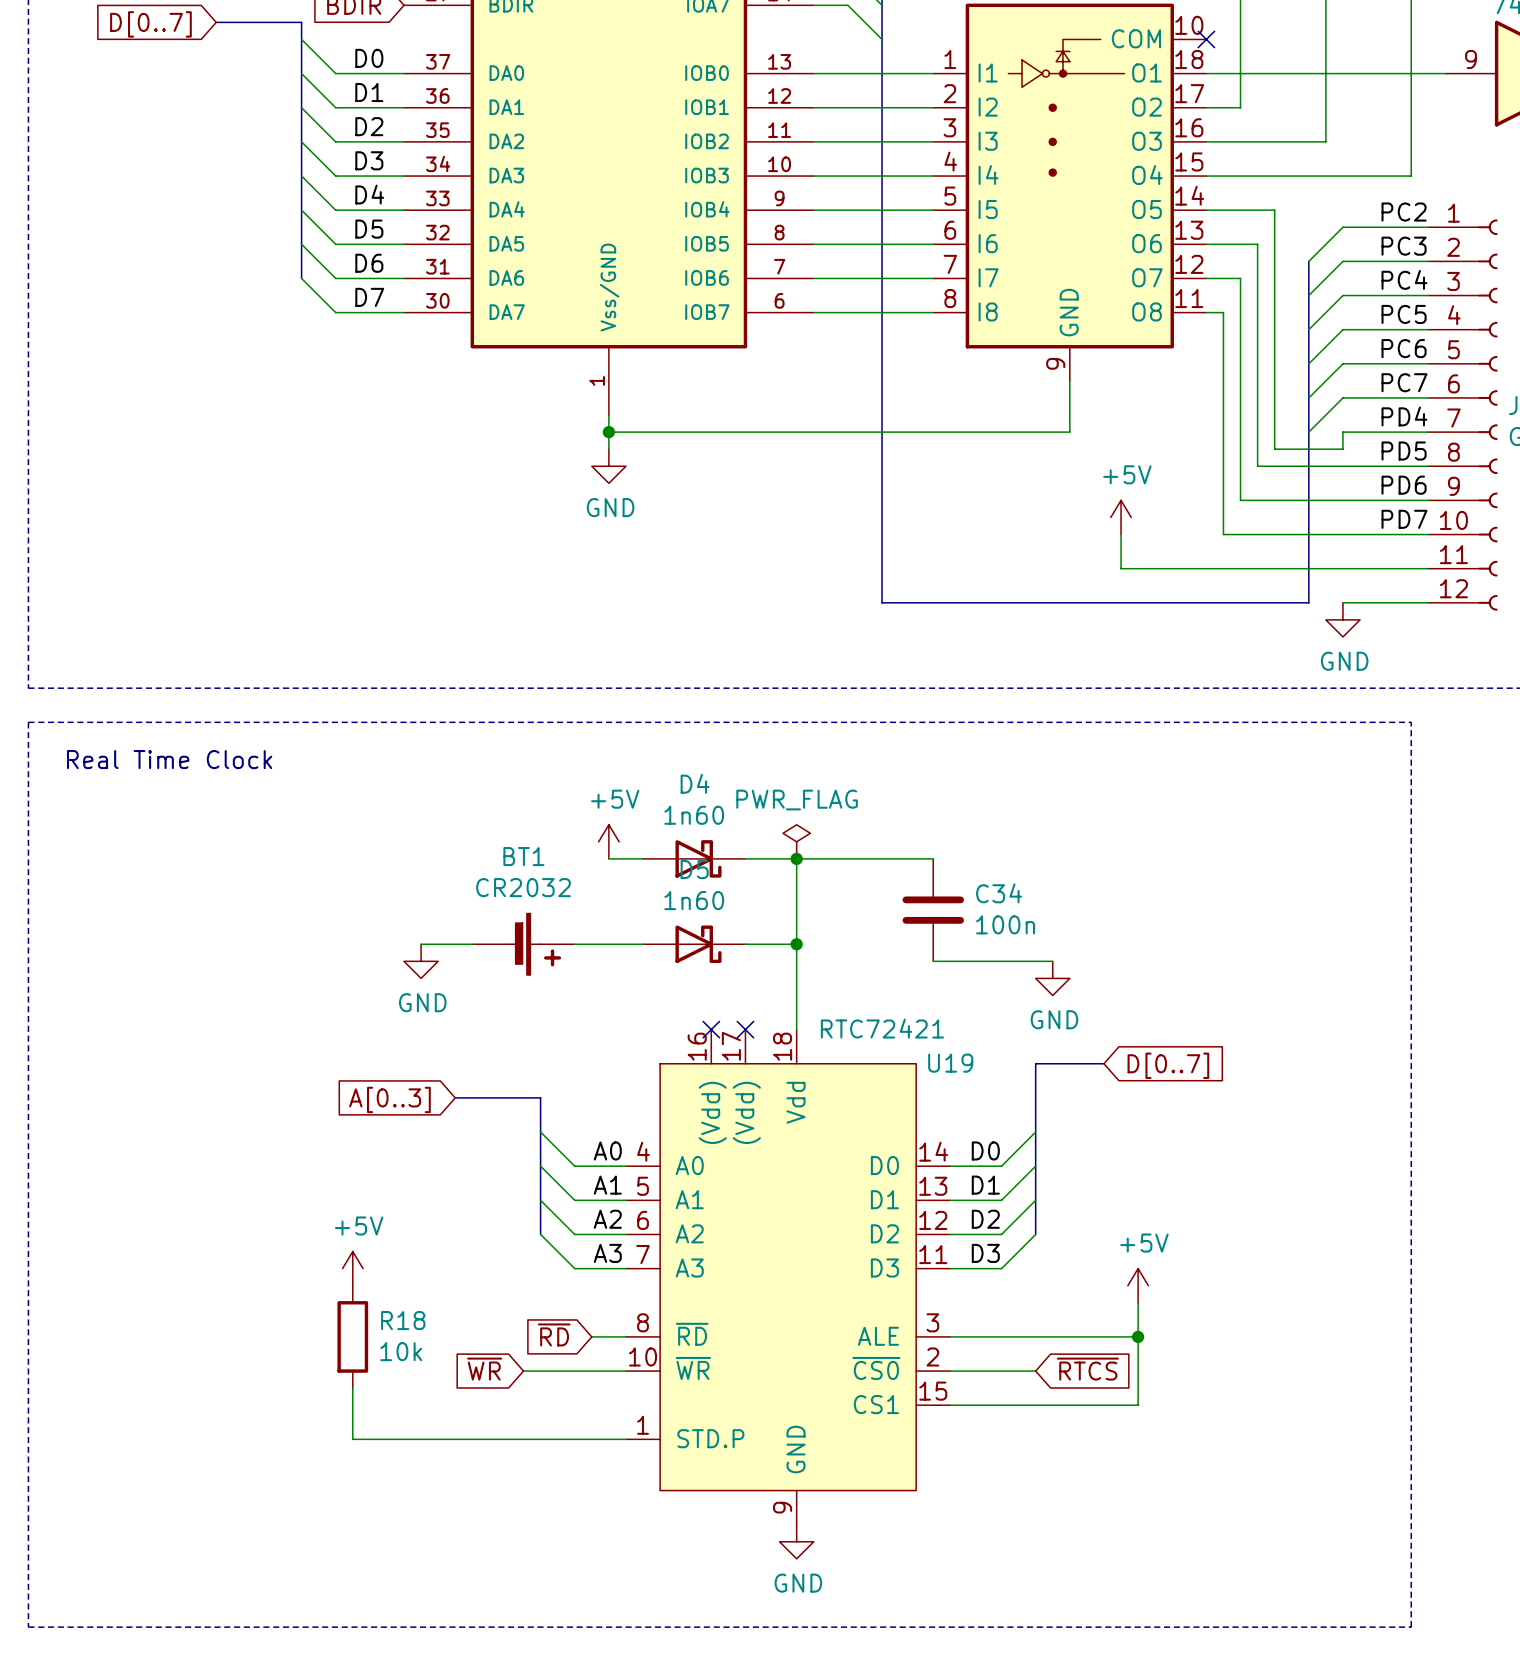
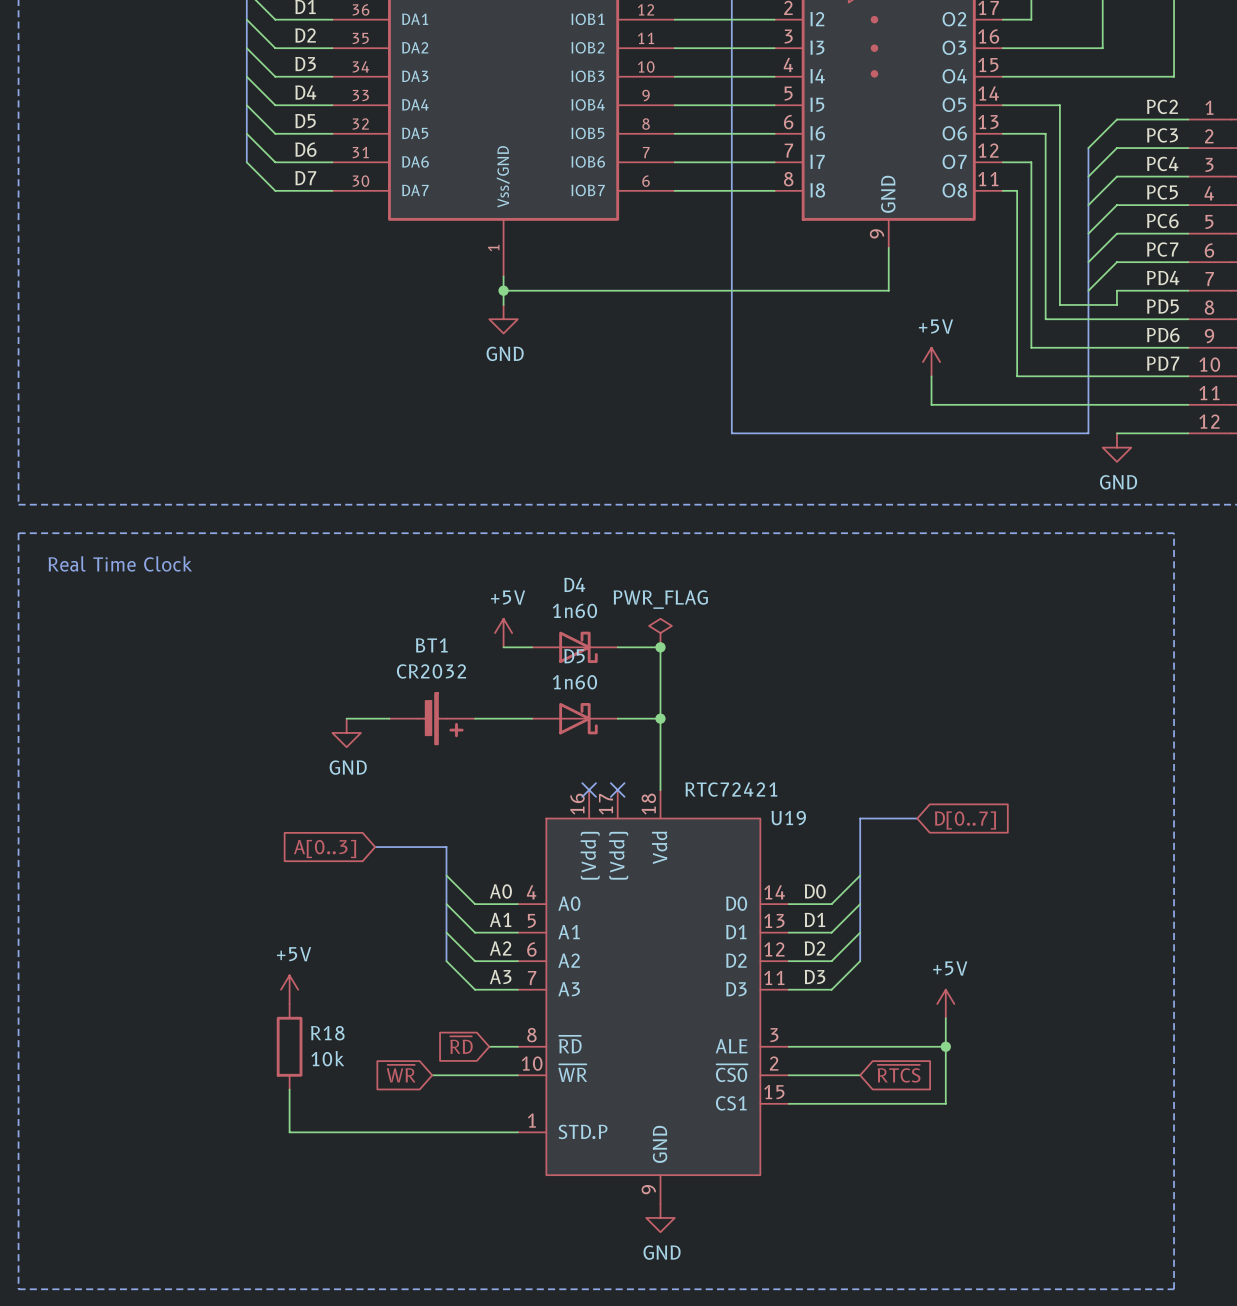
wire: (796, 858) (933, 858) -> none
C34: 100n (933, 910) -> none
wire: (933, 961) (1052, 961) -> none
power symbol: GND (1052, 978) -> none

